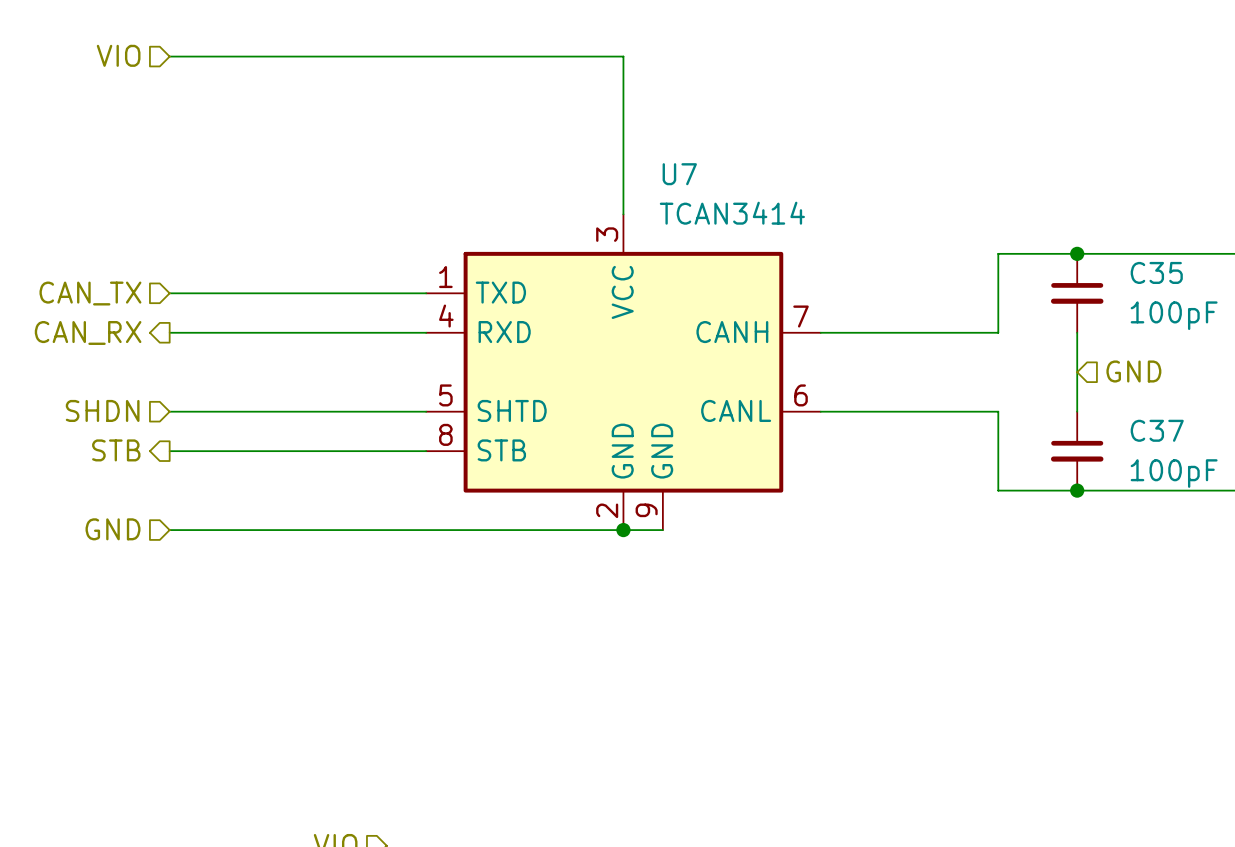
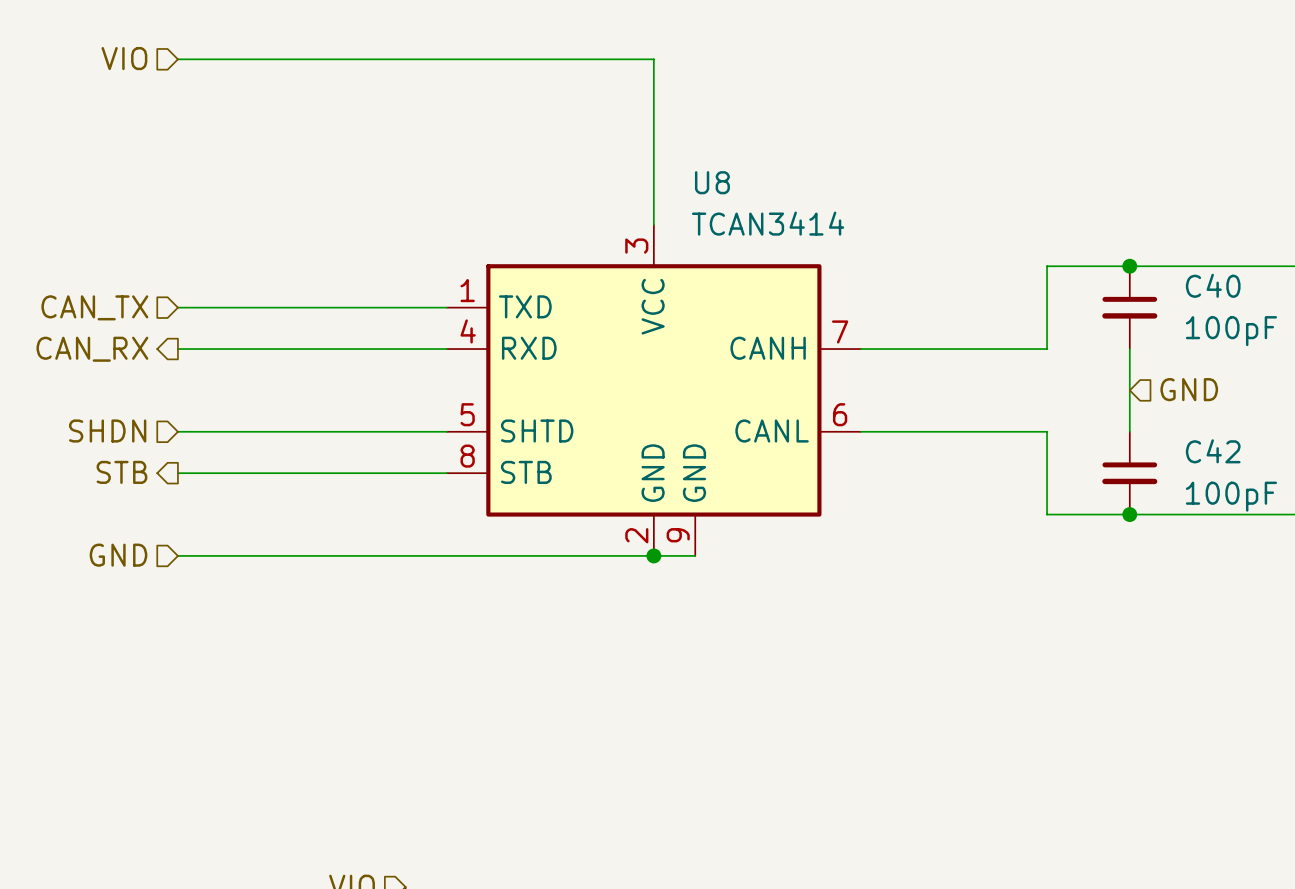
U7 name: U7 (679, 174) -> U8 (712, 182)
C35 name: C35 (1156, 272) -> C40 (1213, 285)
C37 name: C37 (1157, 430) -> C42 (1213, 451)

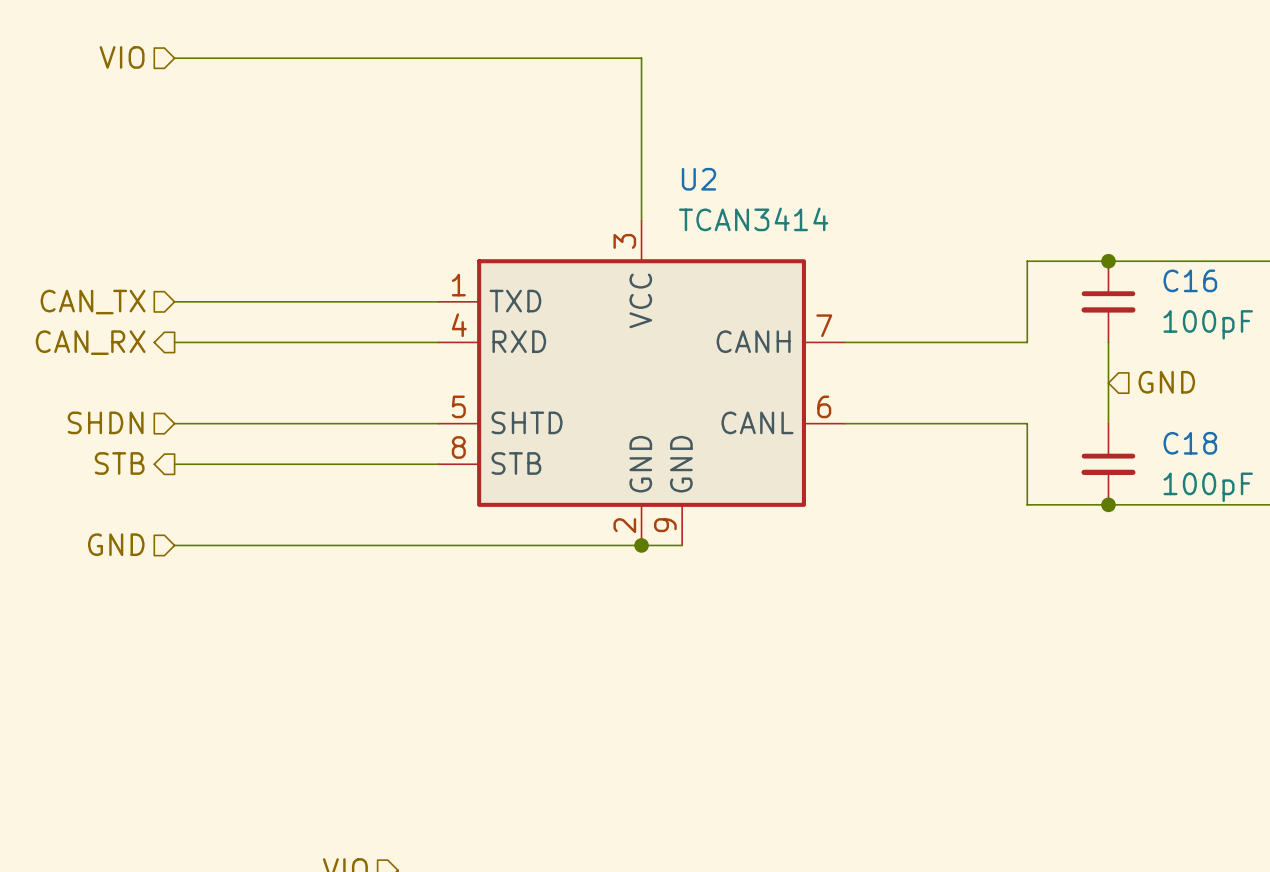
U8 name: U8 (712, 182) -> U2 (699, 179)
C40 name: C40 (1213, 285) -> C16 (1190, 280)
C42 name: C42 (1213, 451) -> C18 (1190, 443)

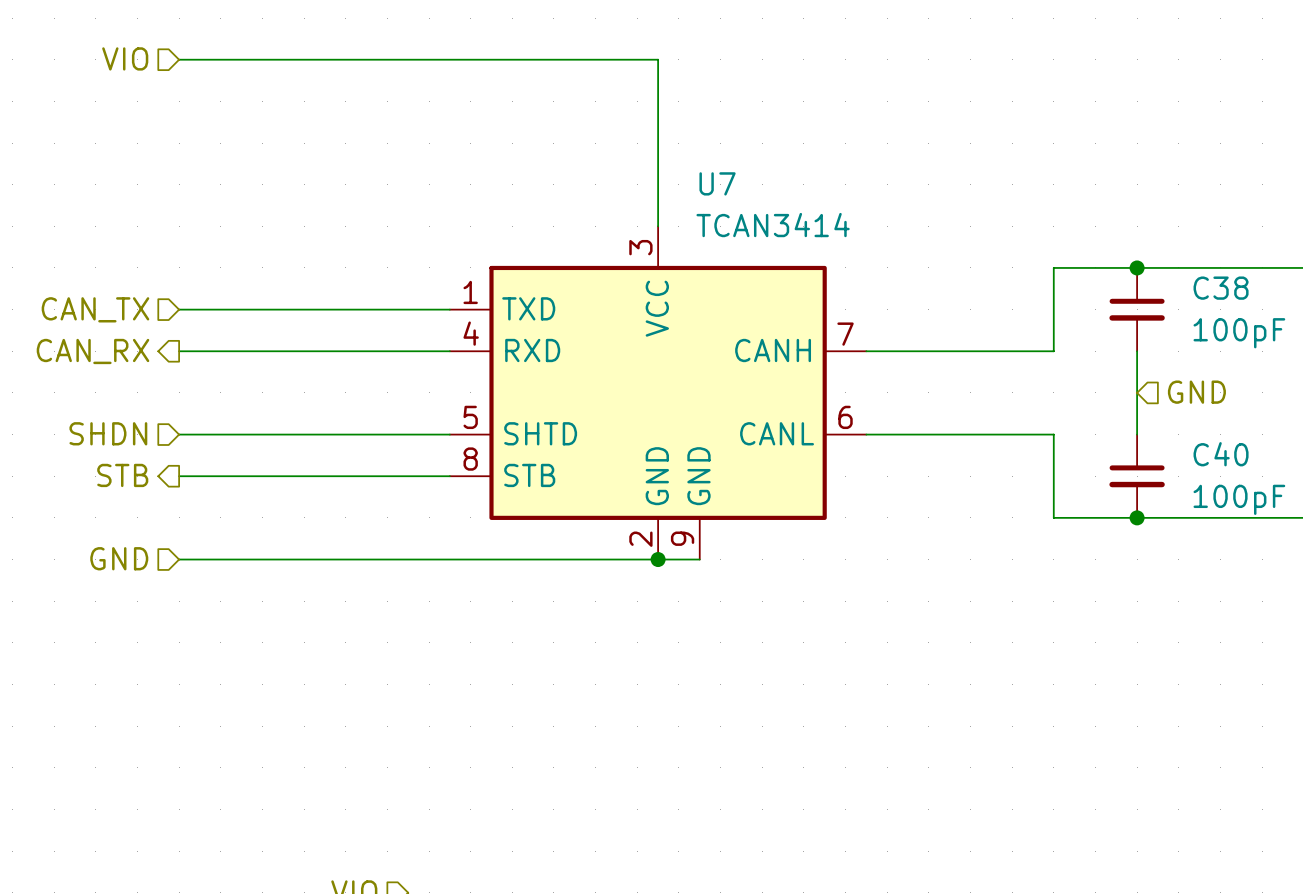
U2 name: U2 (699, 179) -> U7 (717, 183)
C16 name: C16 (1190, 280) -> C38 (1221, 288)
C18 name: C18 (1190, 443) -> C40 (1221, 454)

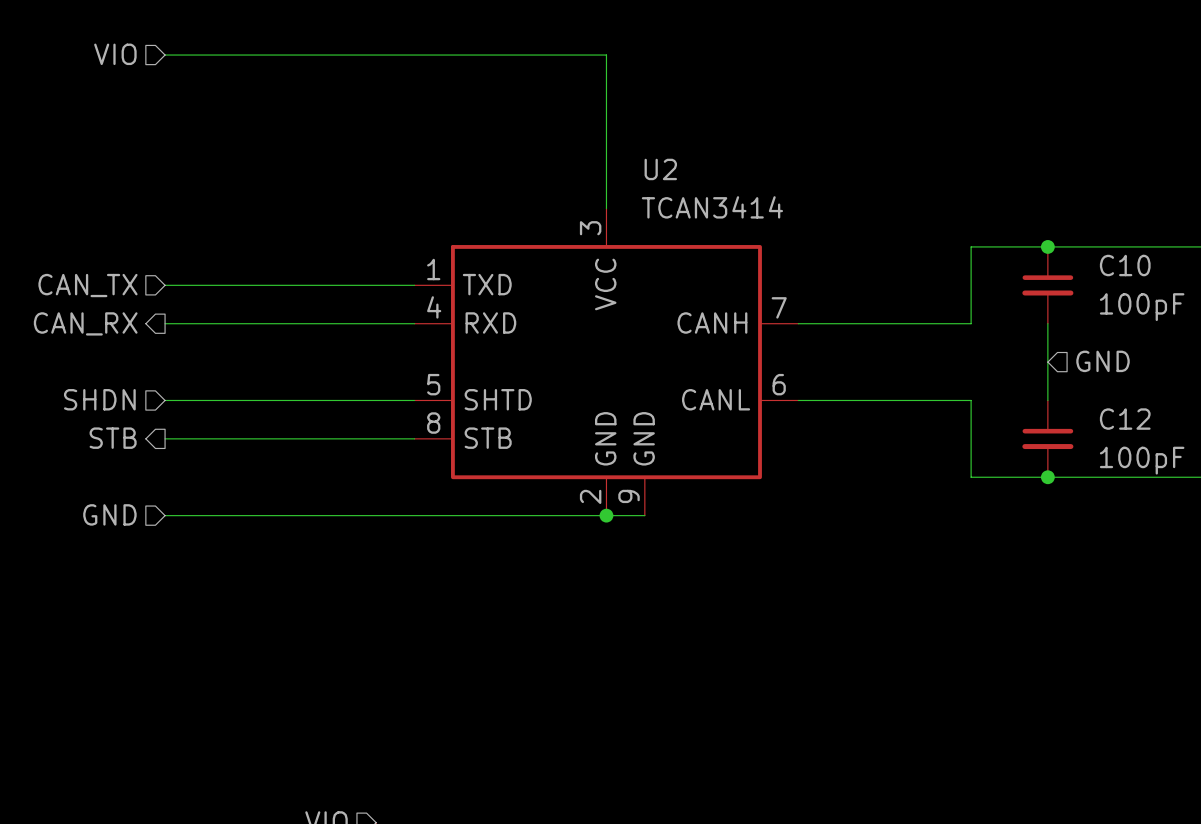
U7 name: U7 (717, 183) -> U2 (660, 169)
C38 name: C38 (1221, 288) -> C10 (1125, 265)
C40 name: C40 (1221, 454) -> C12 (1125, 419)

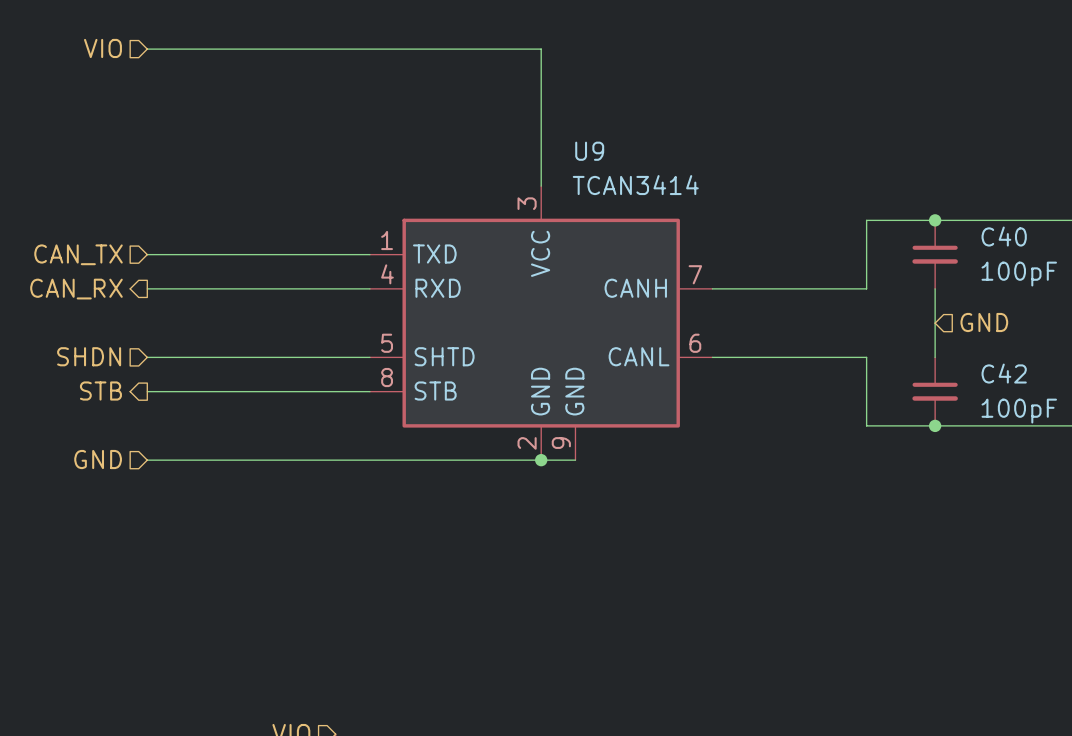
U2 name: U2 (660, 169) -> U9 (589, 151)
C10 name: C10 (1125, 265) -> C40 (1004, 236)
C12 name: C12 (1125, 419) -> C42 (1004, 373)

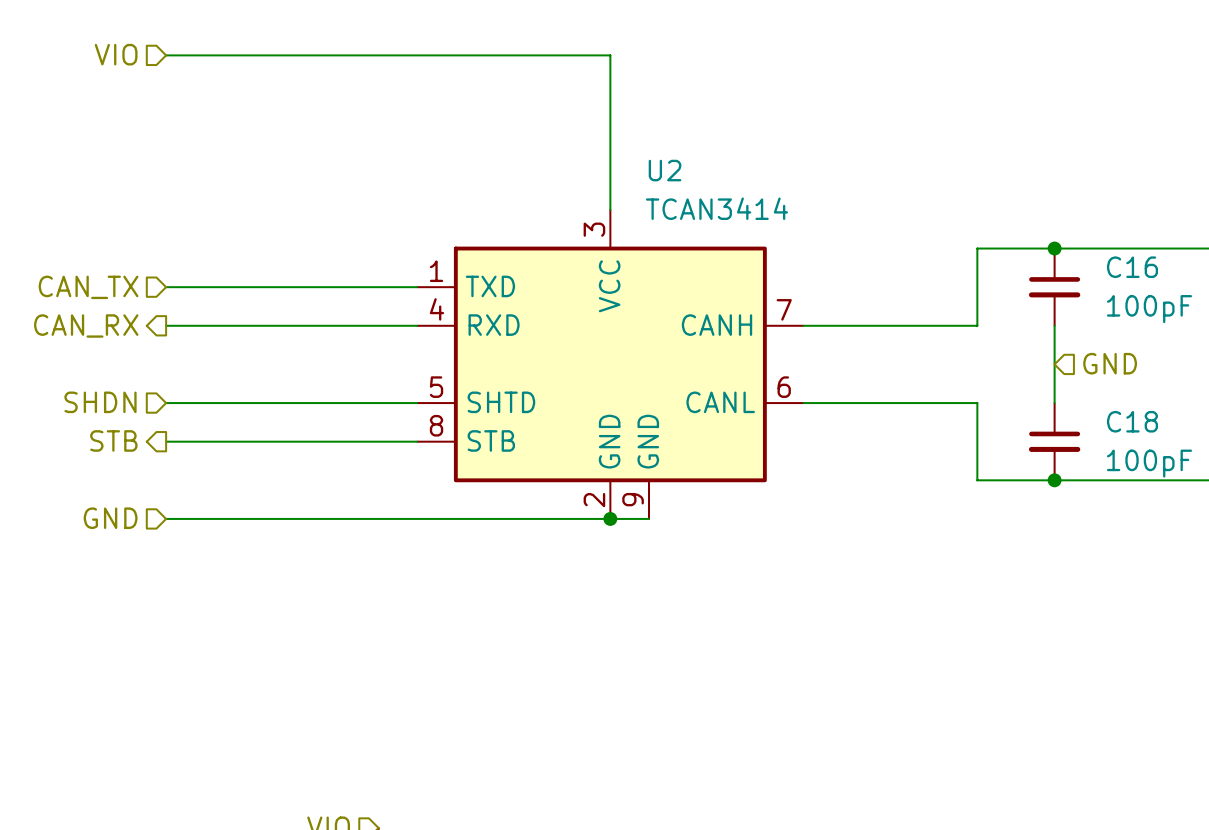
U9 name: U9 (589, 151) -> U2 (665, 170)
C40 name: C40 (1004, 236) -> C16 (1132, 267)
C42 name: C42 (1004, 373) -> C18 (1132, 421)

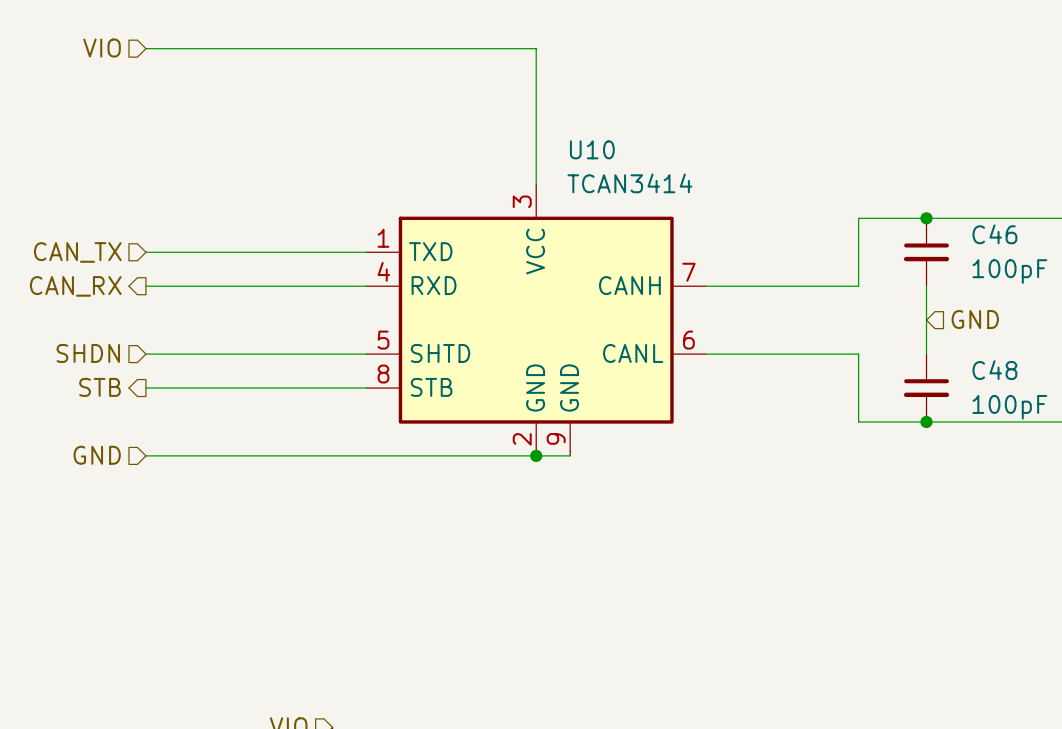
U2 name: U2 (665, 170) -> U10 (592, 149)
C16 name: C16 (1132, 267) -> C46 (994, 234)
C18 name: C18 (1132, 421) -> C48 (994, 370)

